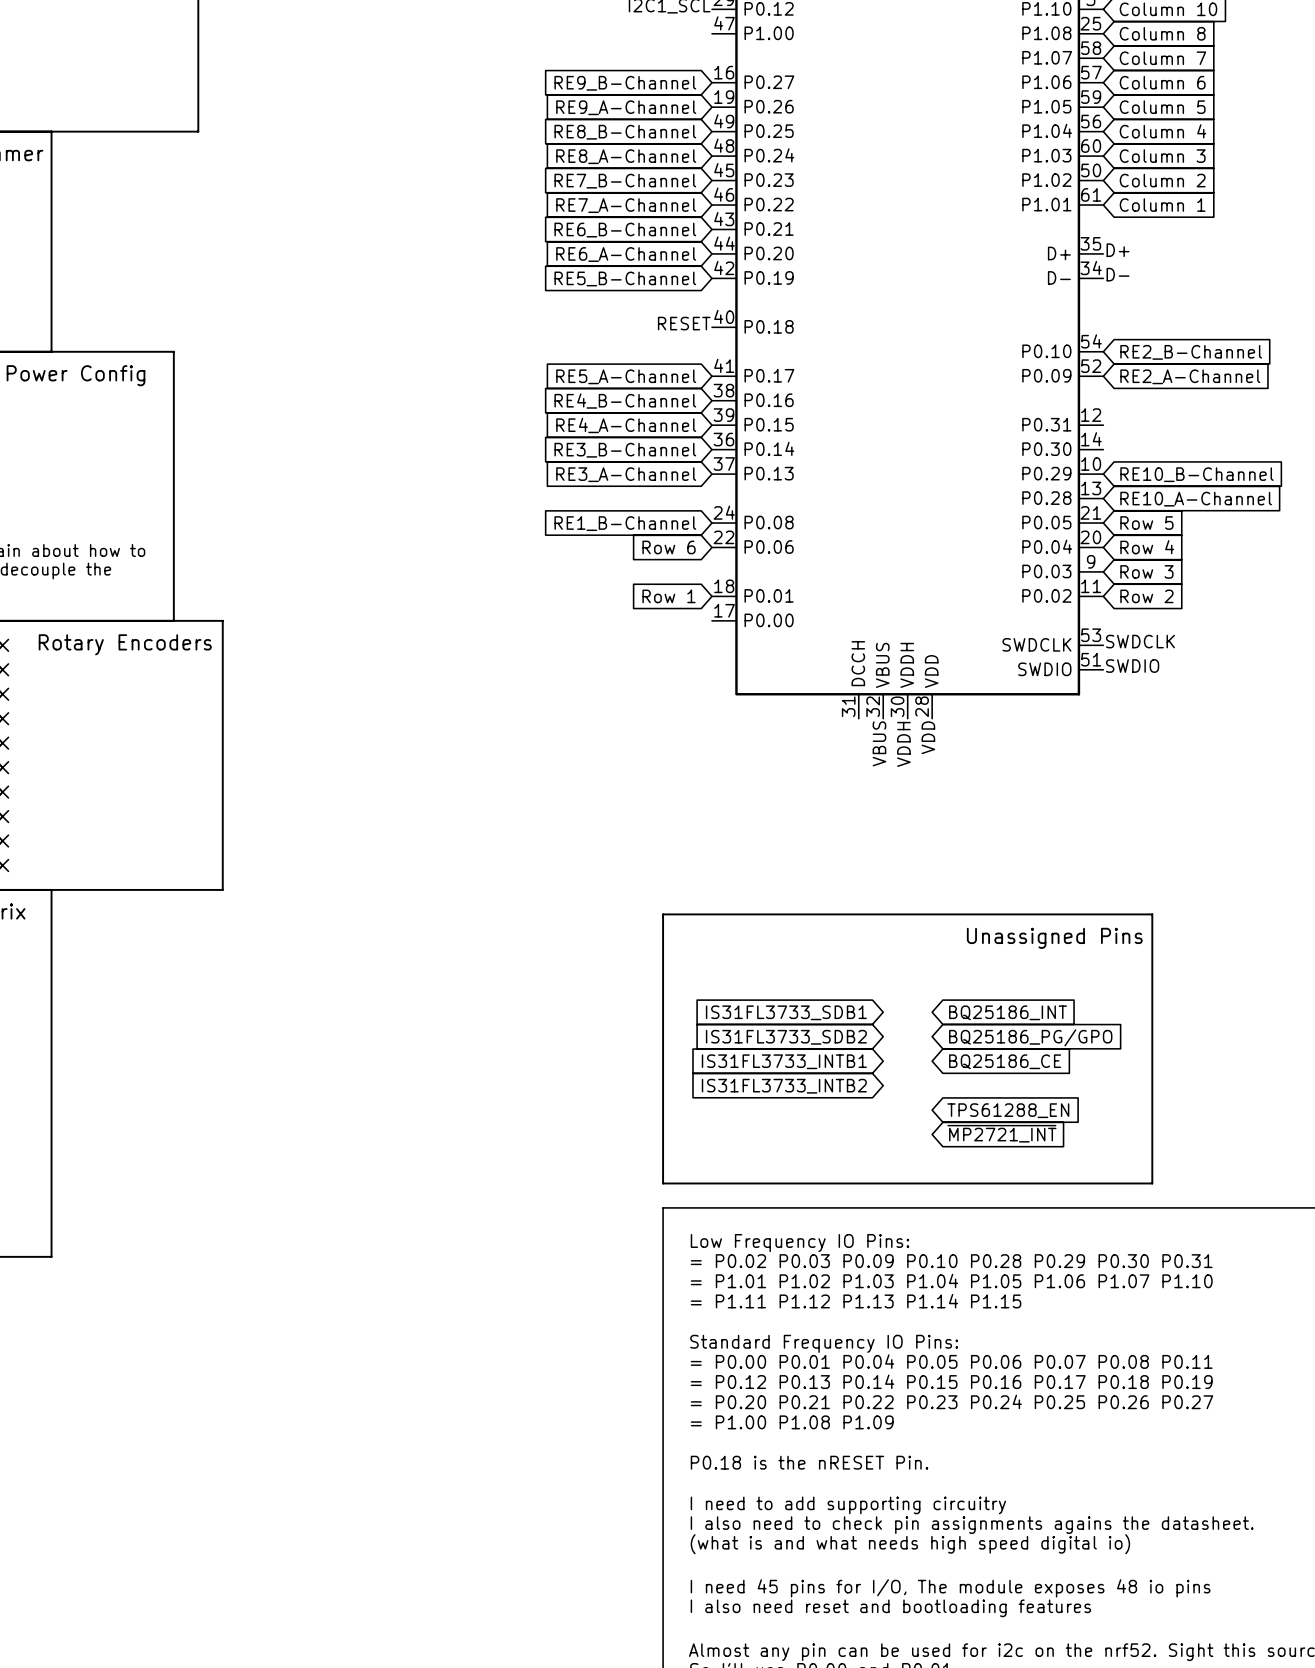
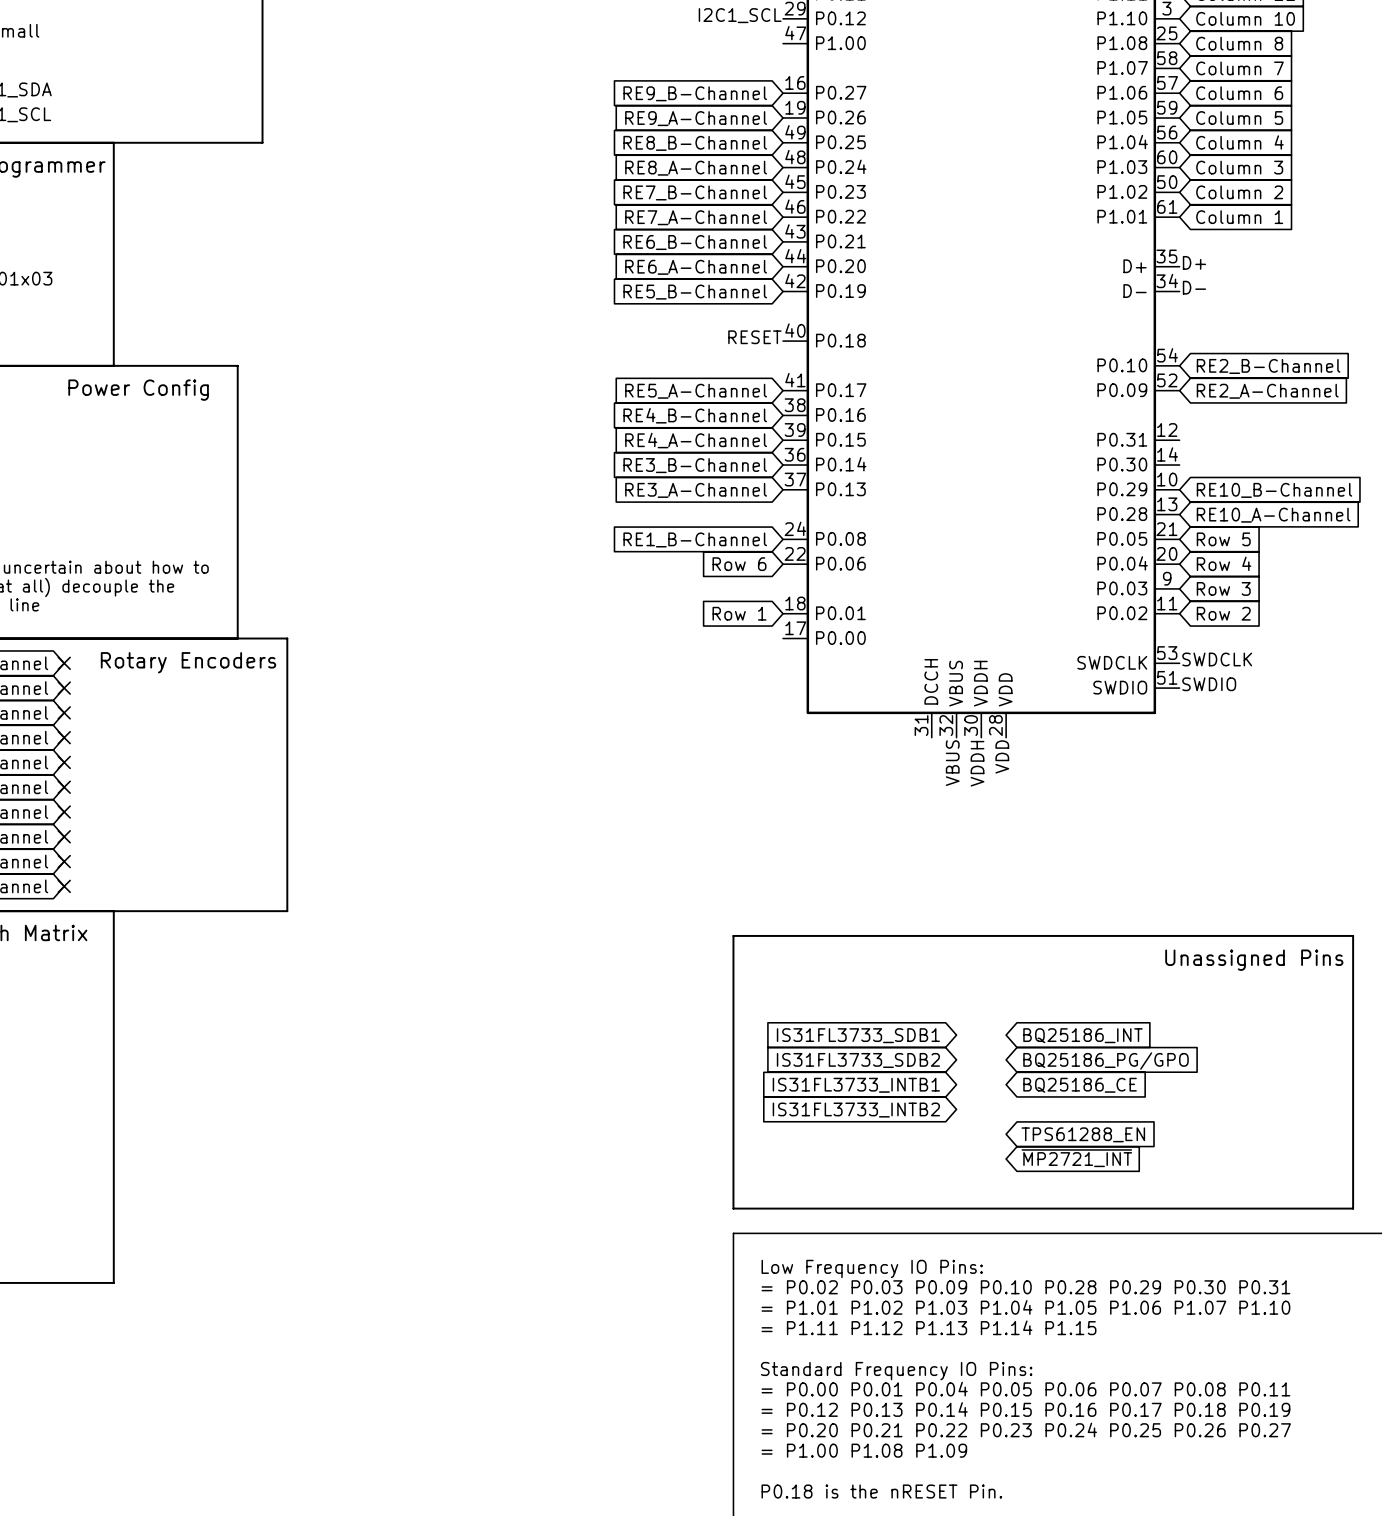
line: (1152, 914) (1152, 1183) -> (1229, 935) (1353, 935) (1353, 1208) (1229, 1208)
text position: Unassigned Pins (1054, 938) -> Unassigned Pins (1254, 960)

